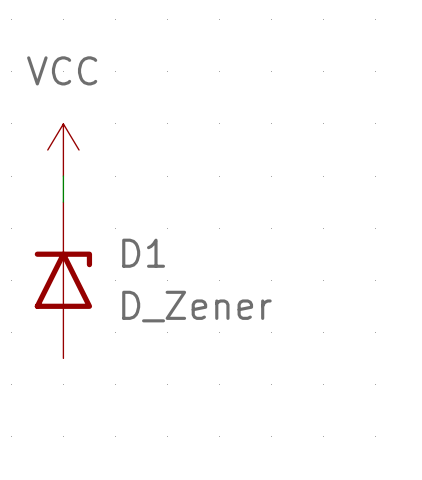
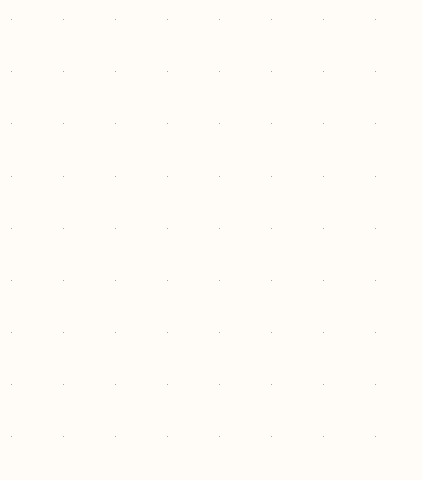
power symbol: VCC (63, 150) -> none
wire: (63, 176) (63, 202) -> none
D1: D_Zener (63, 280) -> none

